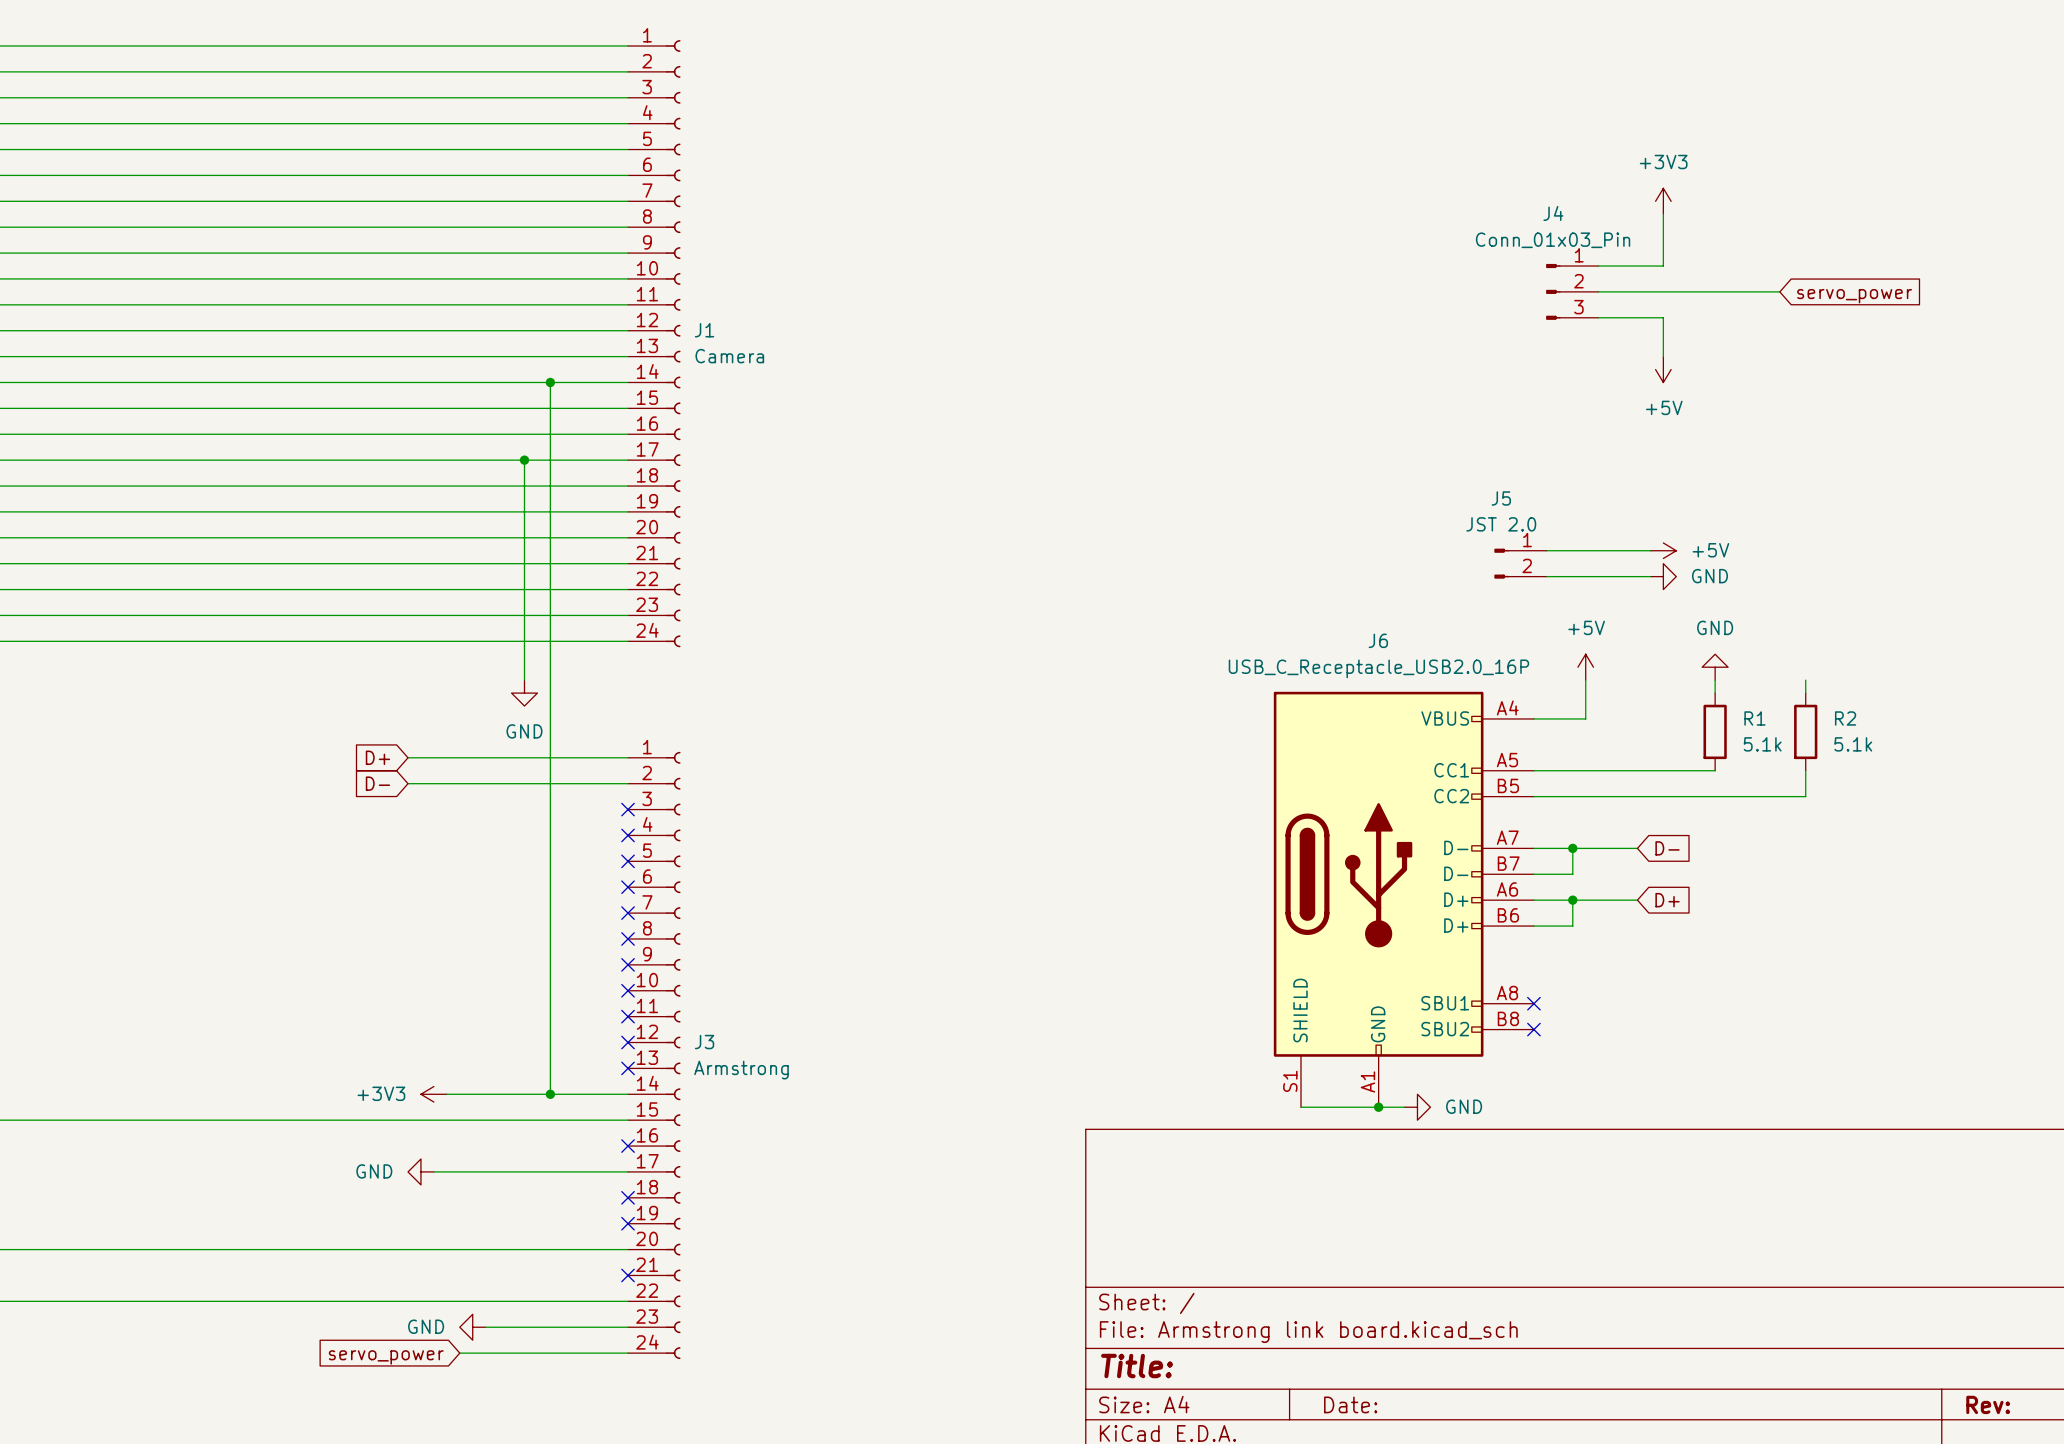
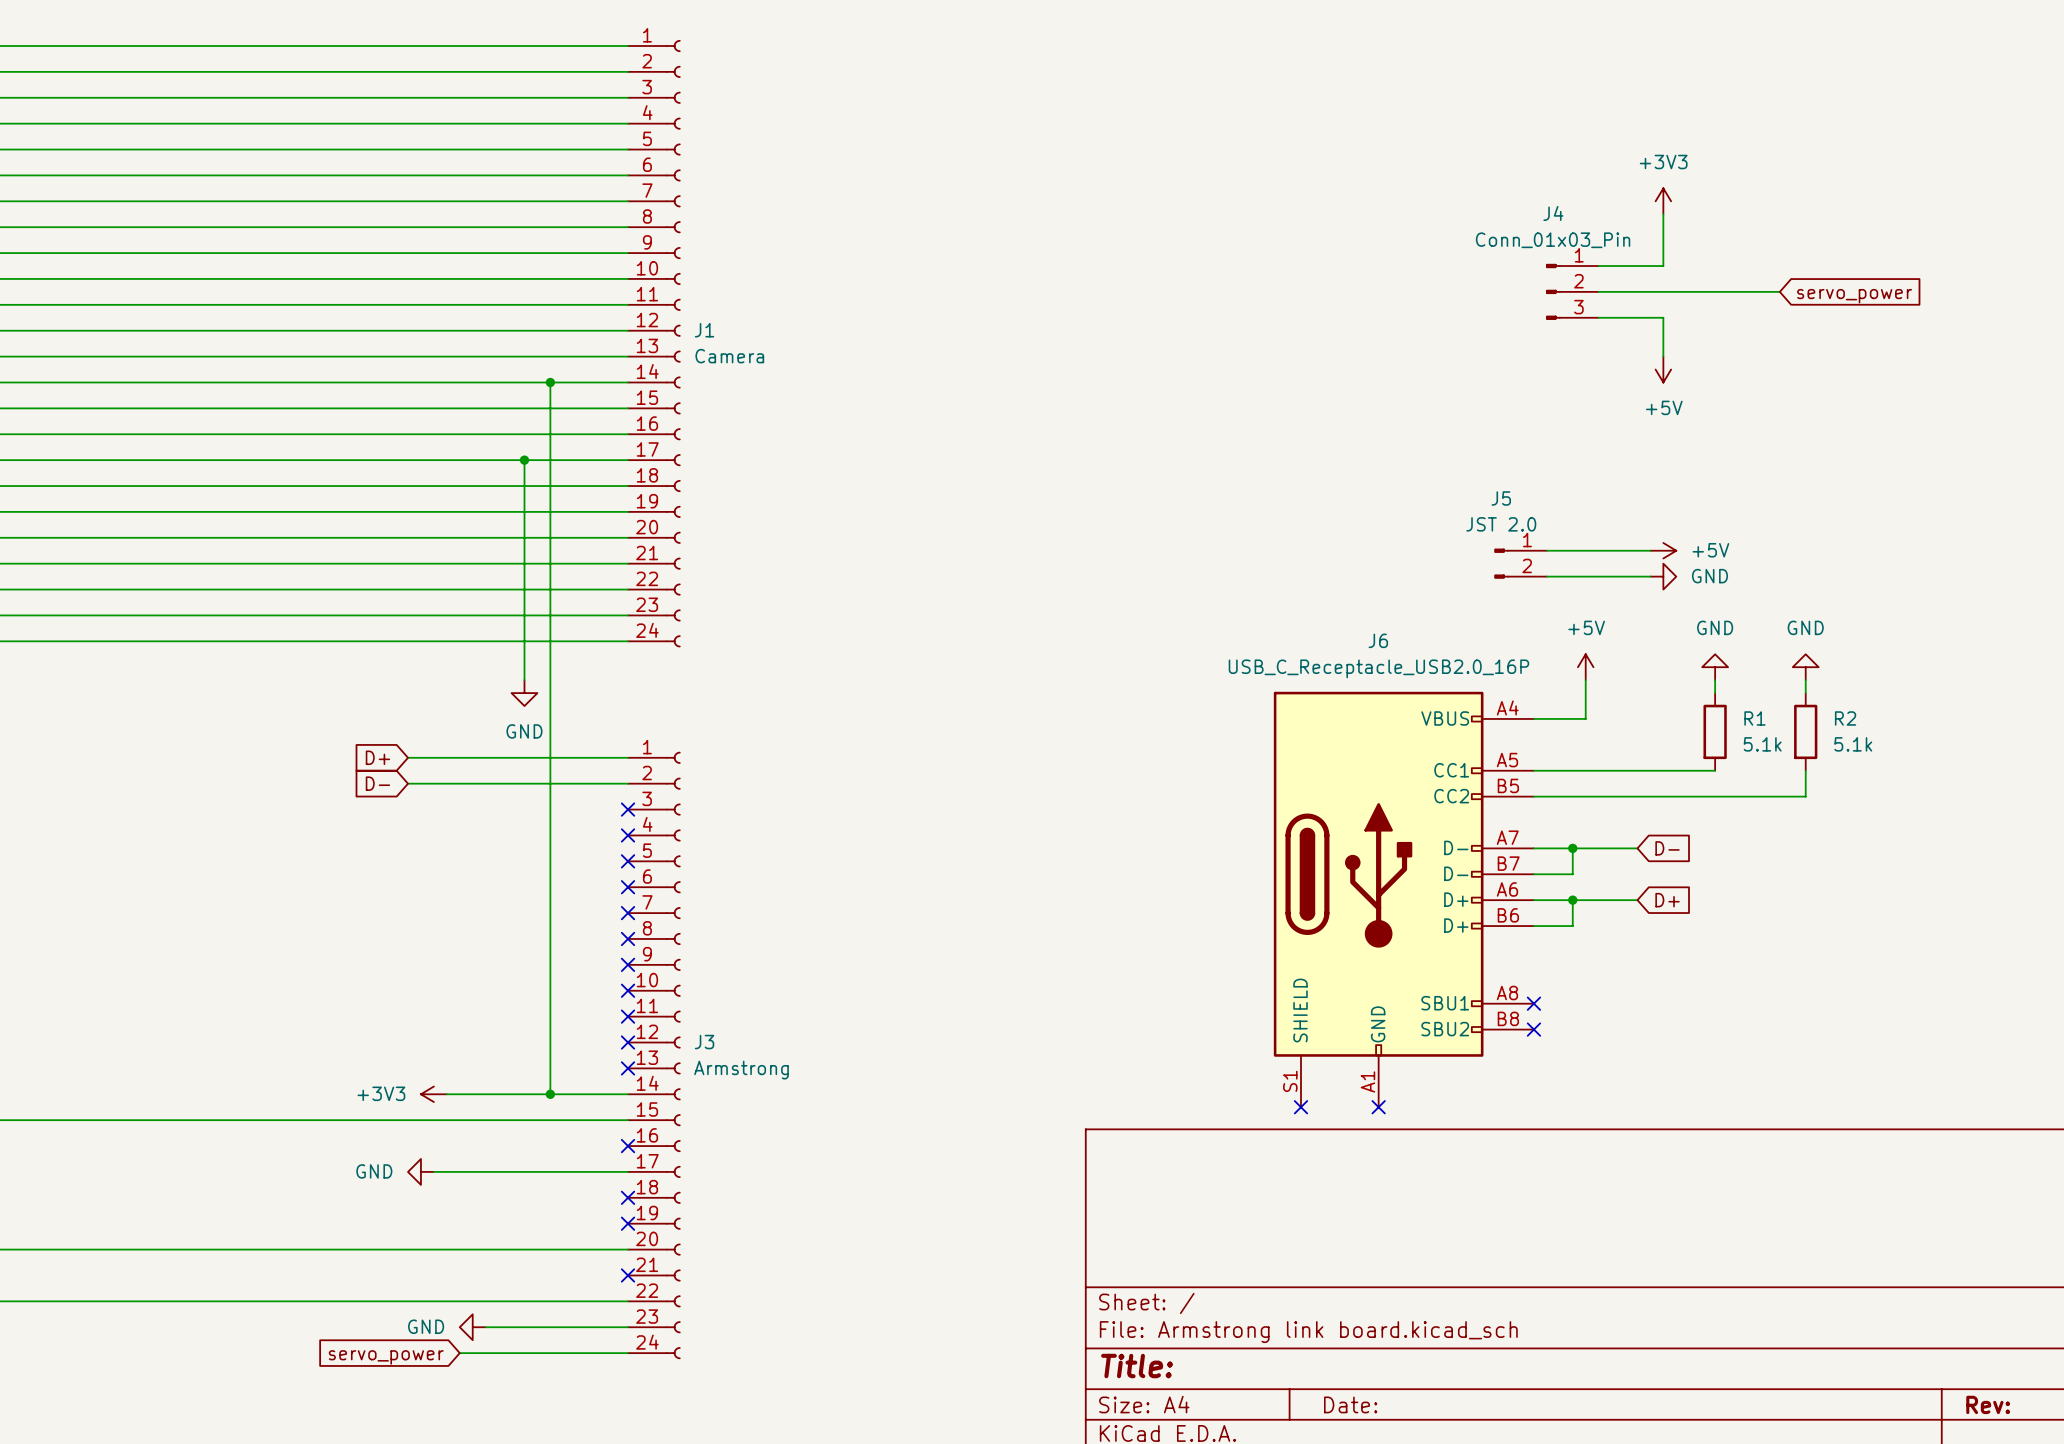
power symbol: none -> GND (1805, 667)
wire: (1300, 1107) (1404, 1107) -> none
no-connect mark: none -> (1300, 1107)
junction: (1378, 1107) -> none
no-connect mark: none -> (1378, 1107)
power symbol: GND (1417, 1107) -> none

